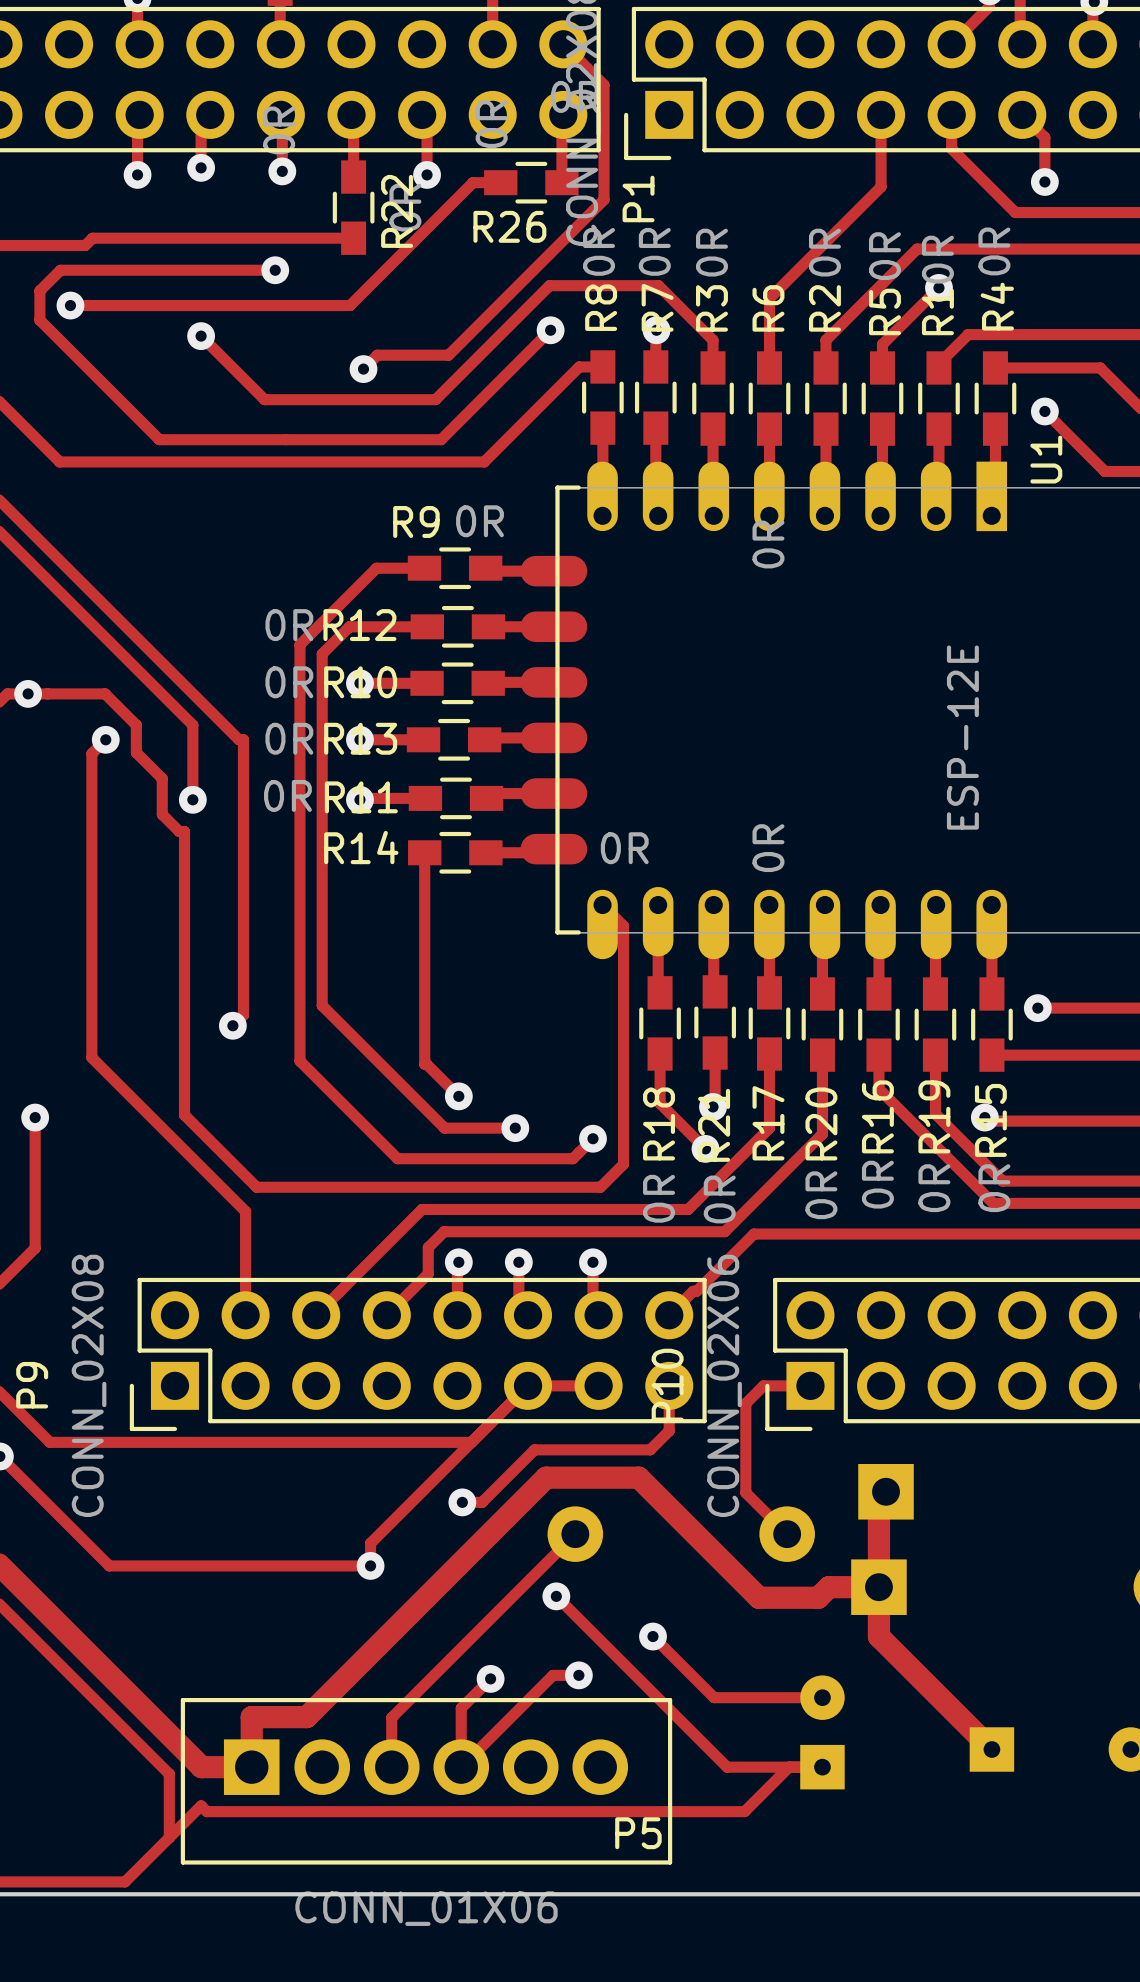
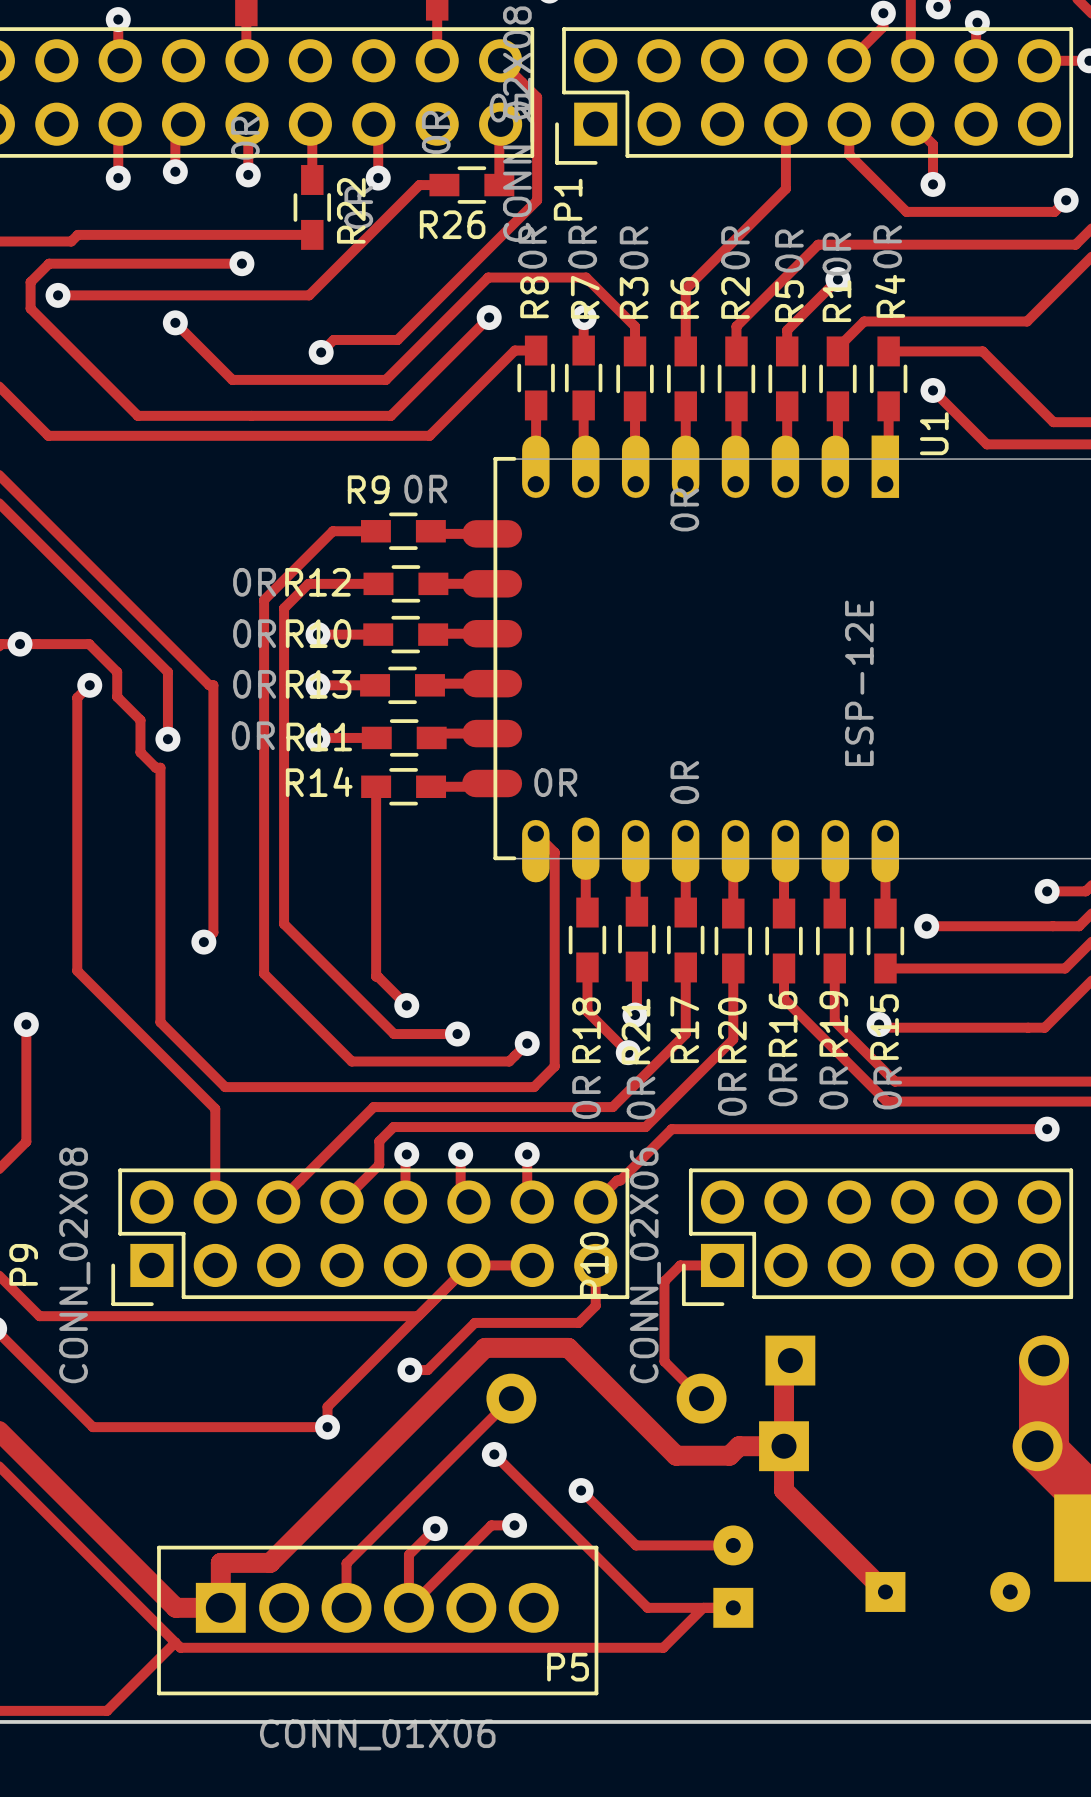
track: (169, 1774) (169, 1837) -> (146, 1614) (175, 1642)

